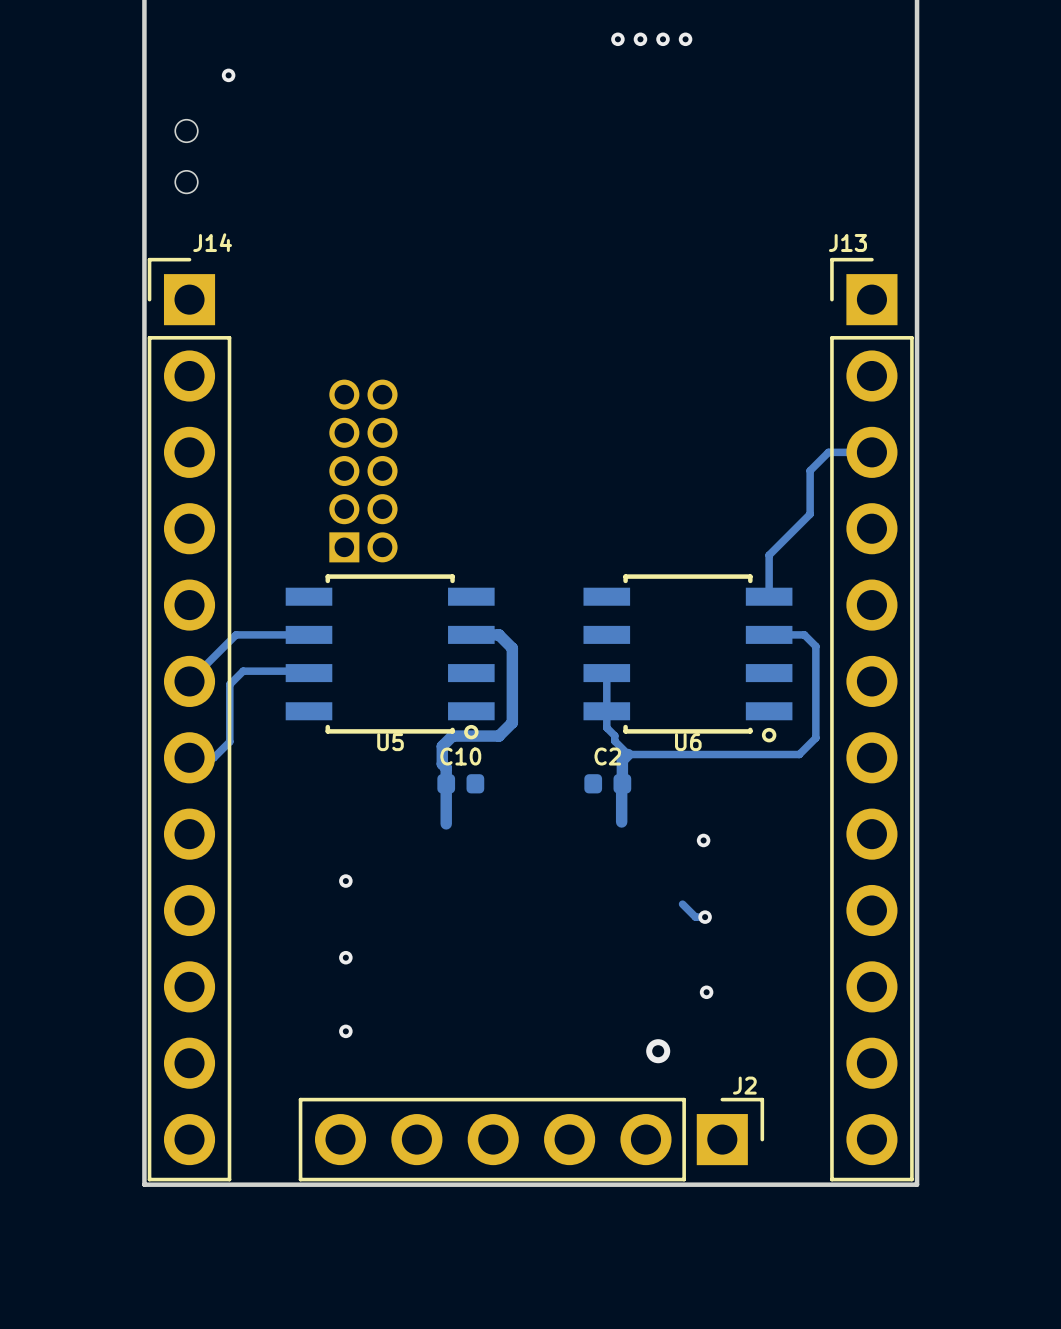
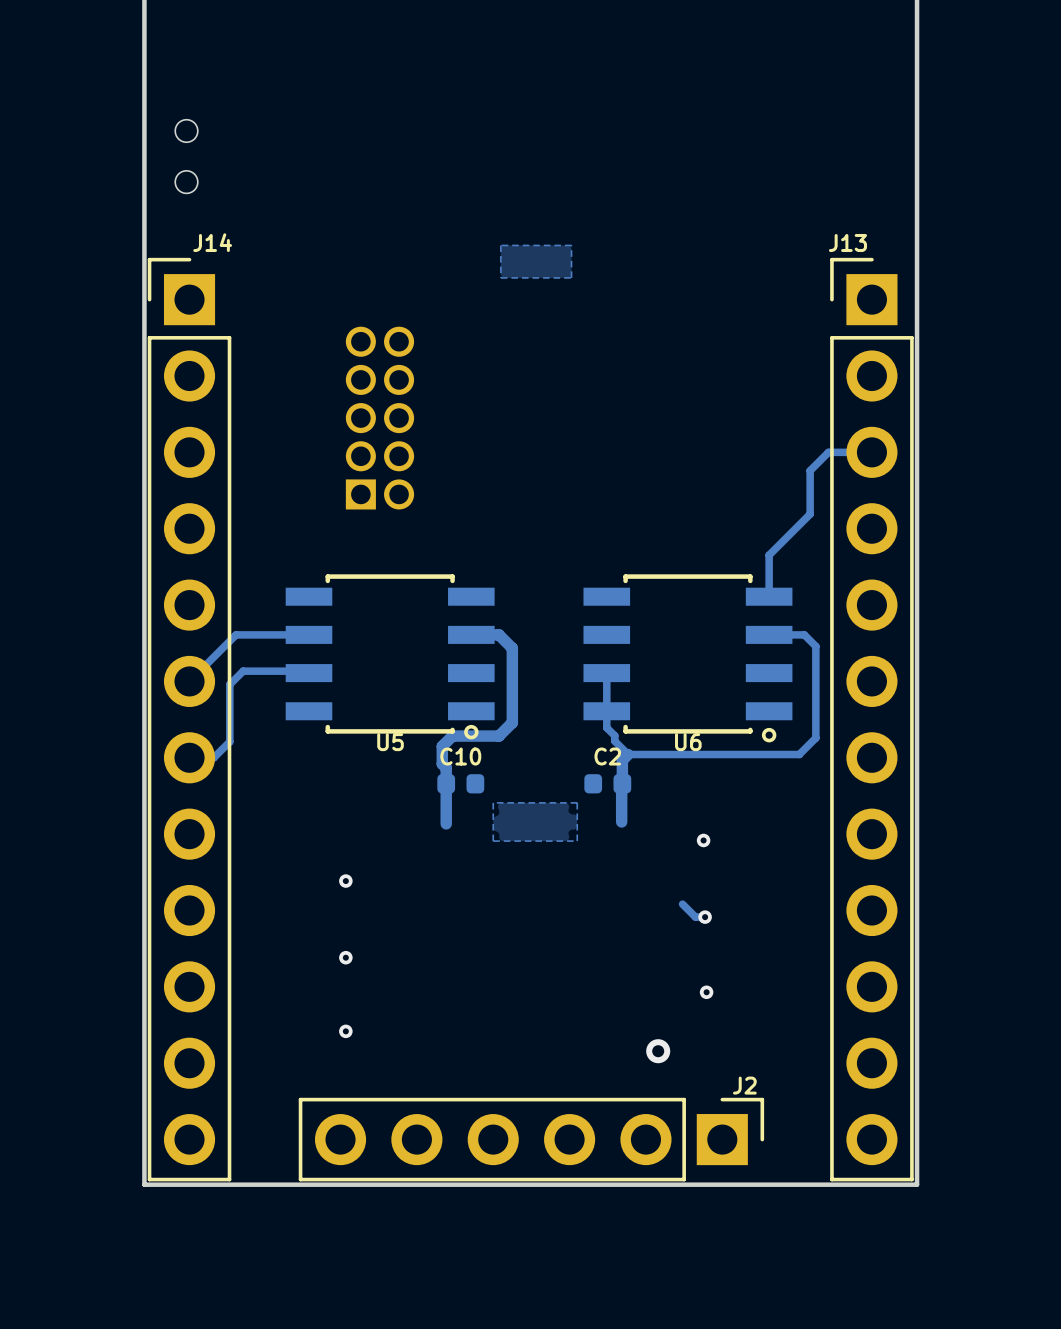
via: (617, 39) -> none
via: (640, 39) -> none
via: (663, 39) -> none
via: (685, 39) -> none
via: (228, 75) -> none
zone outline: none -> (571, 245) (571, 277) (500, 277) (500, 245) (571, 245)
part position: (363, 471) -> (379, 418)
zone outline: none -> (577, 802) (577, 841) (493, 841) (493, 802) (577, 802)

